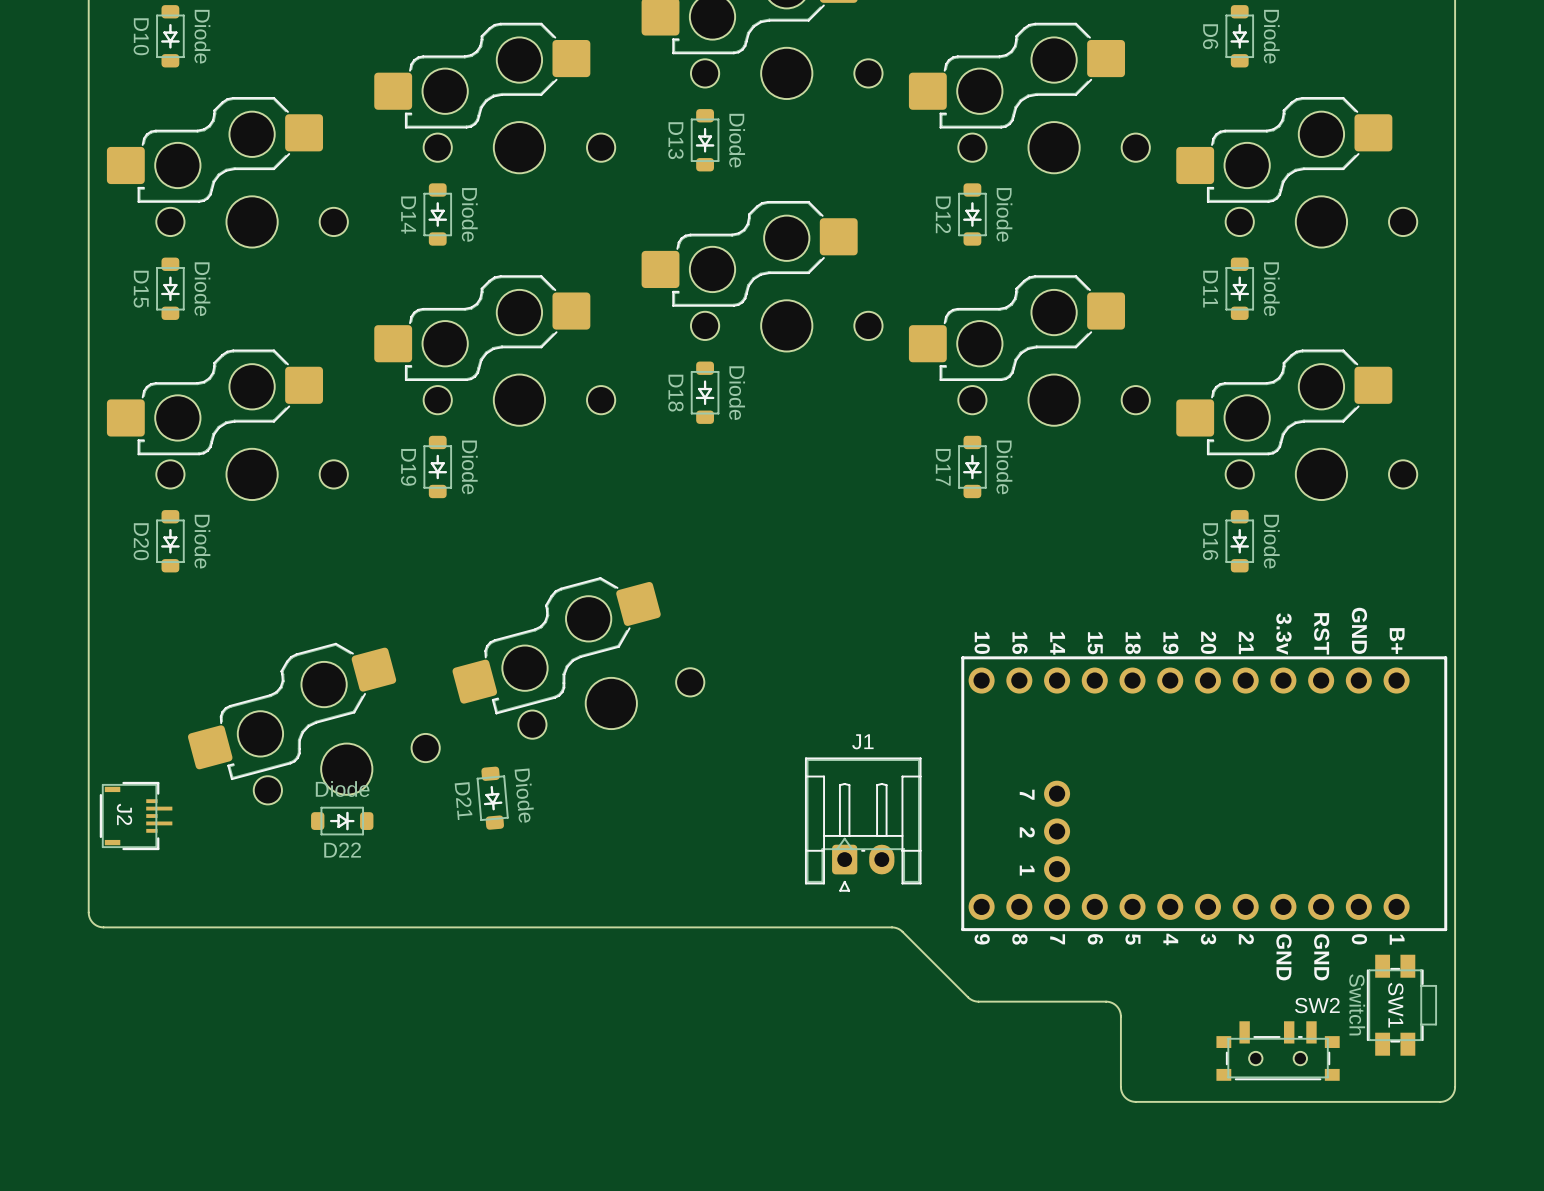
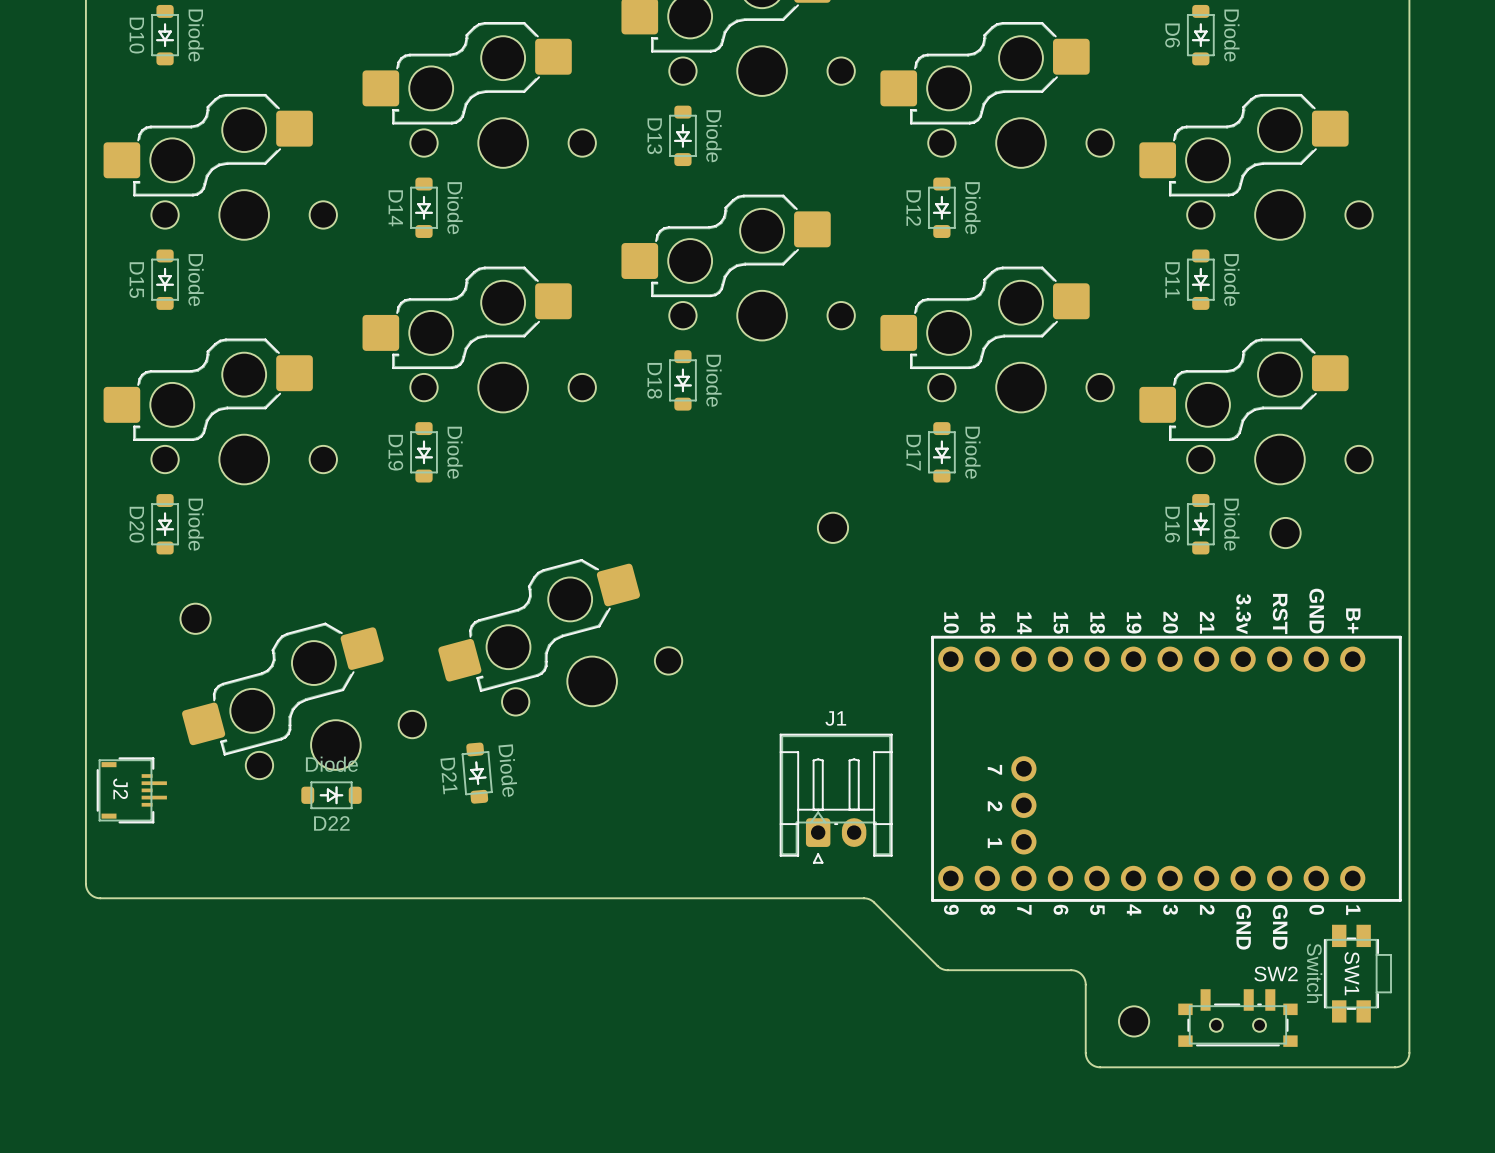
part: none -> (832, 527)
part: none -> (1285, 533)
part: none -> (195, 618)
part: none -> (1134, 1021)

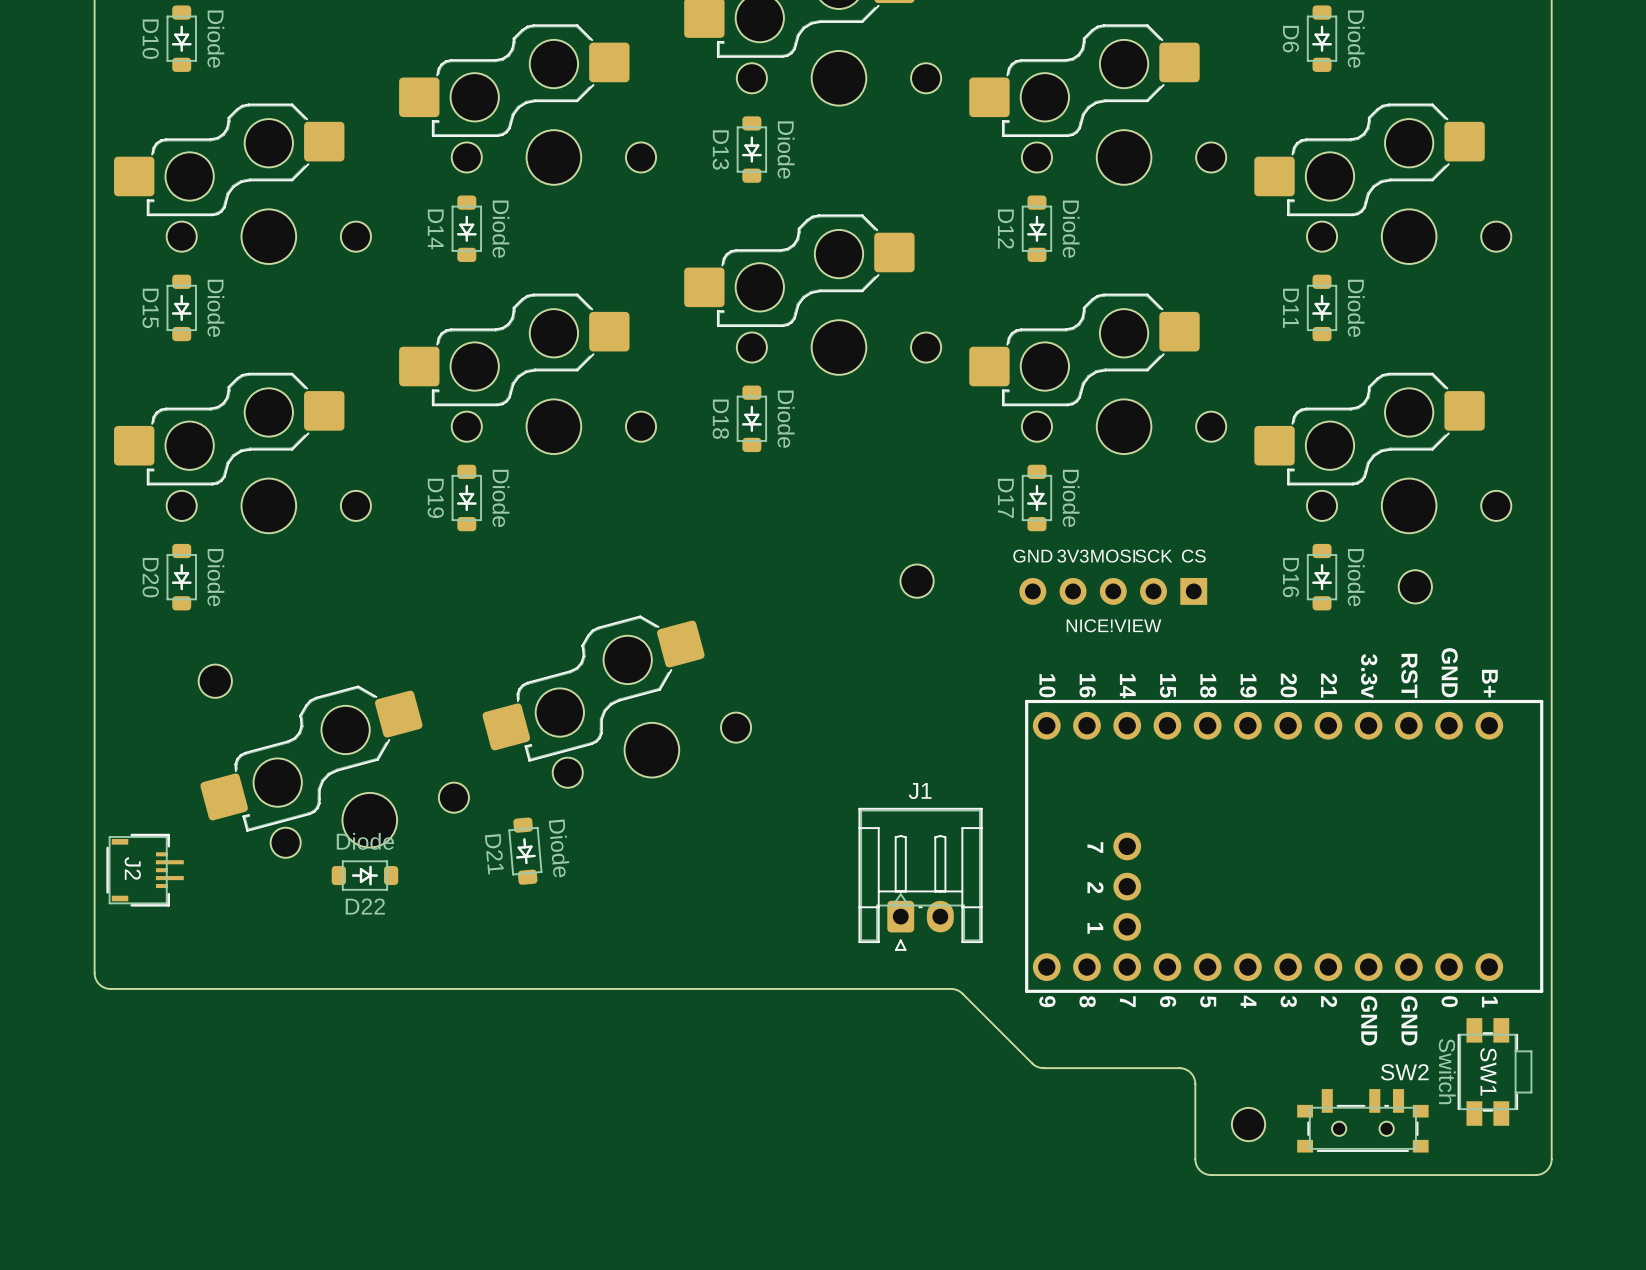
text: none -> GND (1032, 556)
text: none -> 3V3 (1073, 556)
text: none -> MOSI (1113, 556)
text: none -> SCK (1153, 556)
text: none -> CS (1193, 556)
part: none -> (1113, 591)
text: none -> NICE!VIEW (1114, 625)

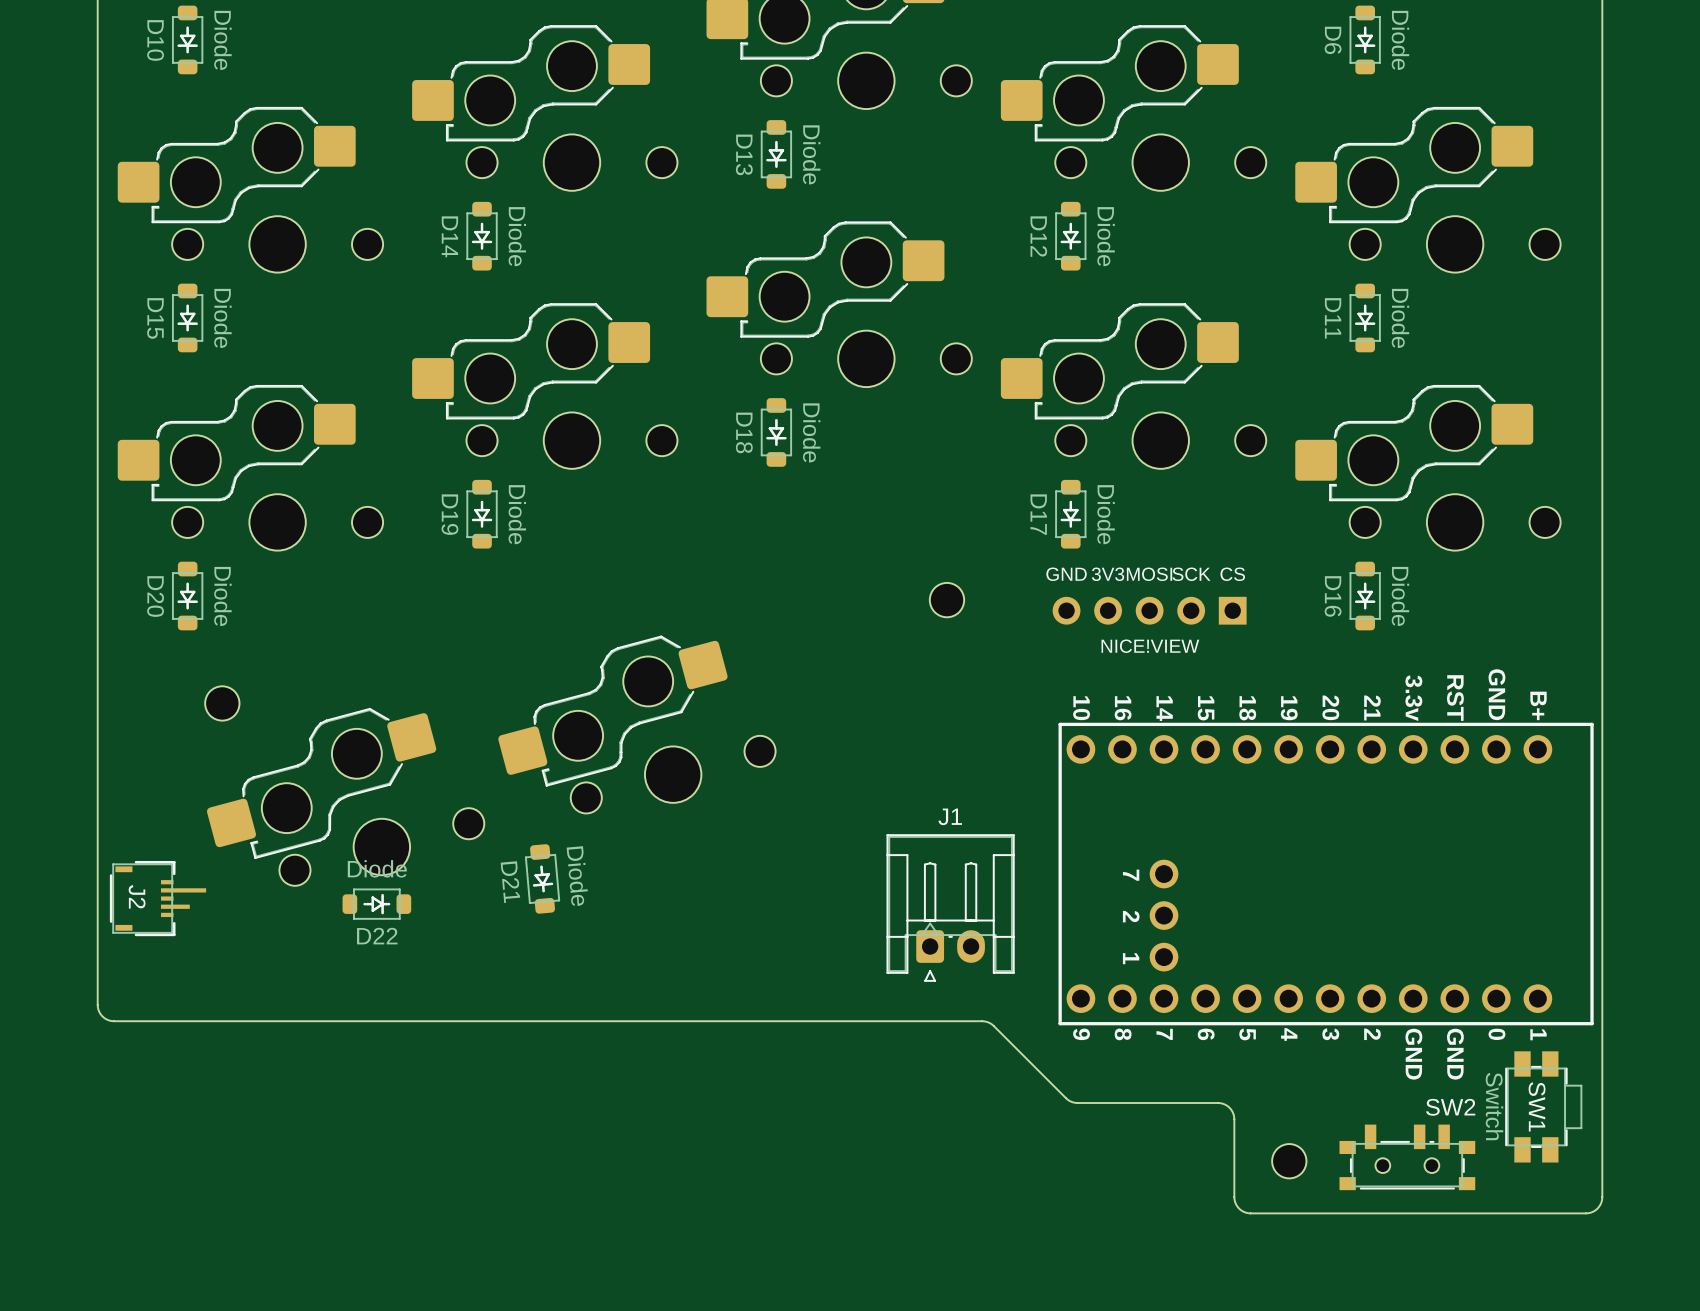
part: (1415, 586) -> none
J2 footprint: [106, 833, 184, 907] -> [109, 860, 207, 937]

